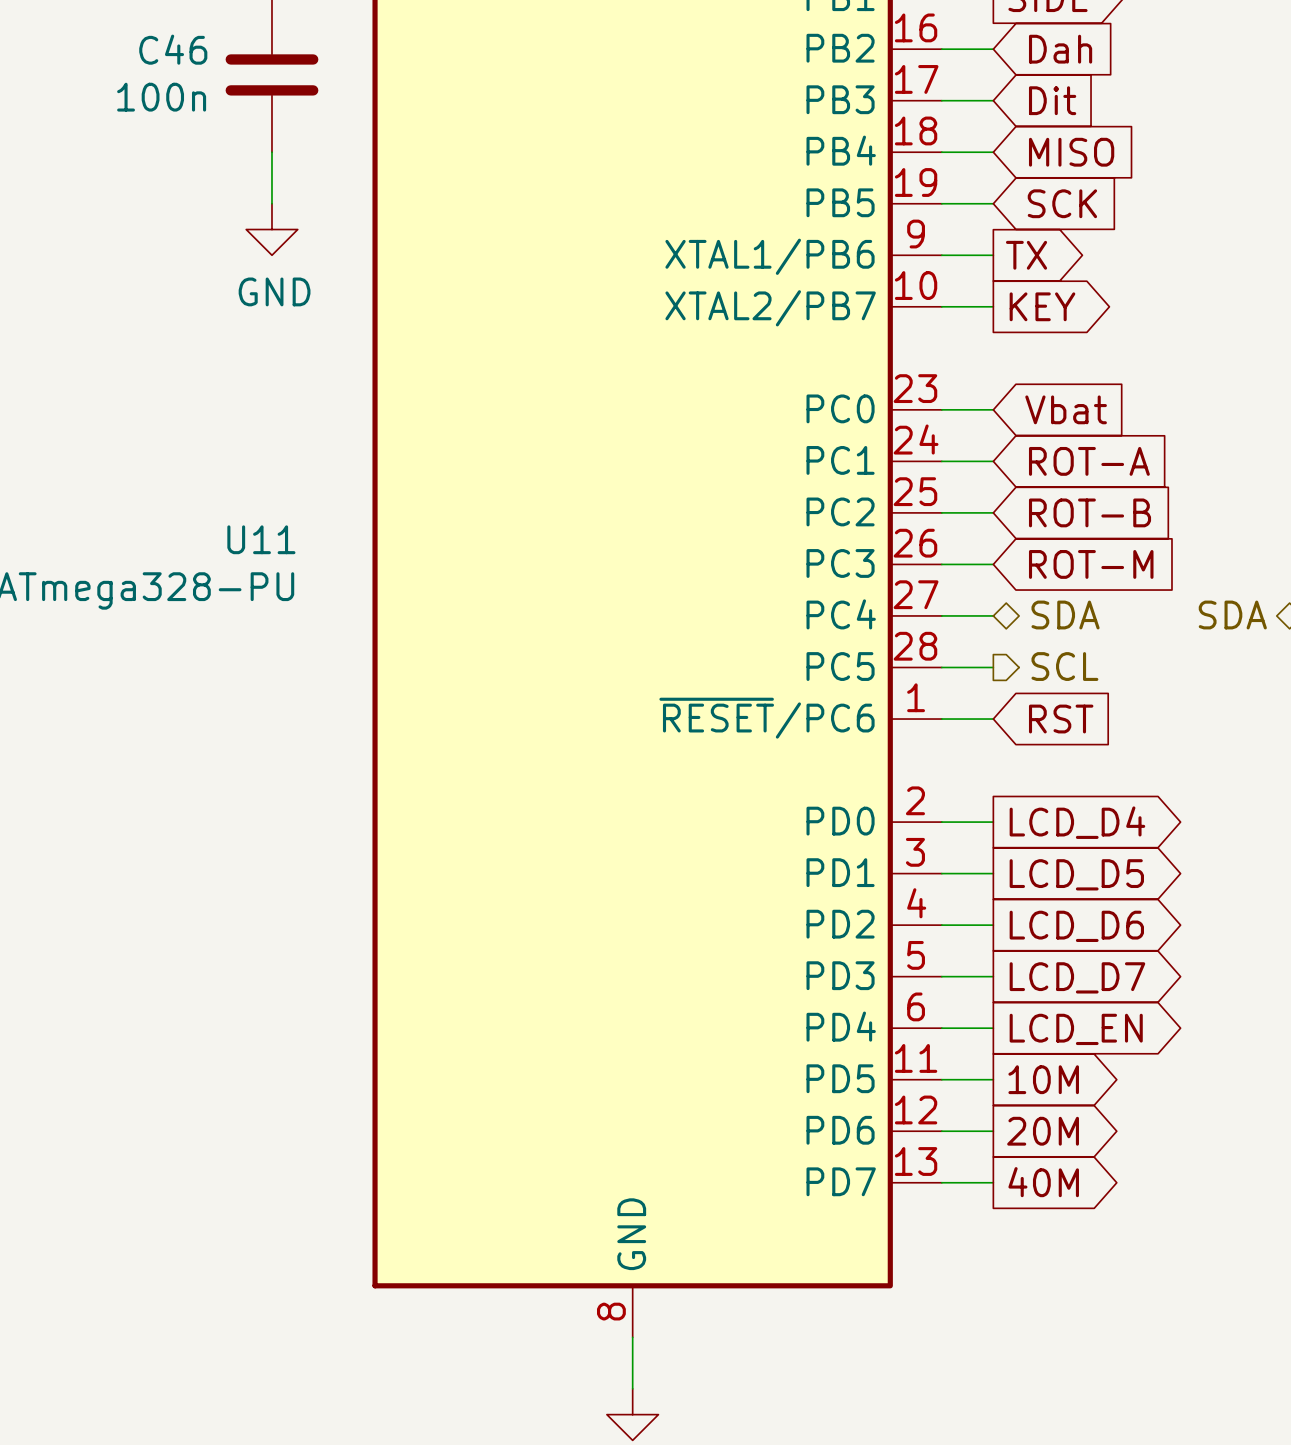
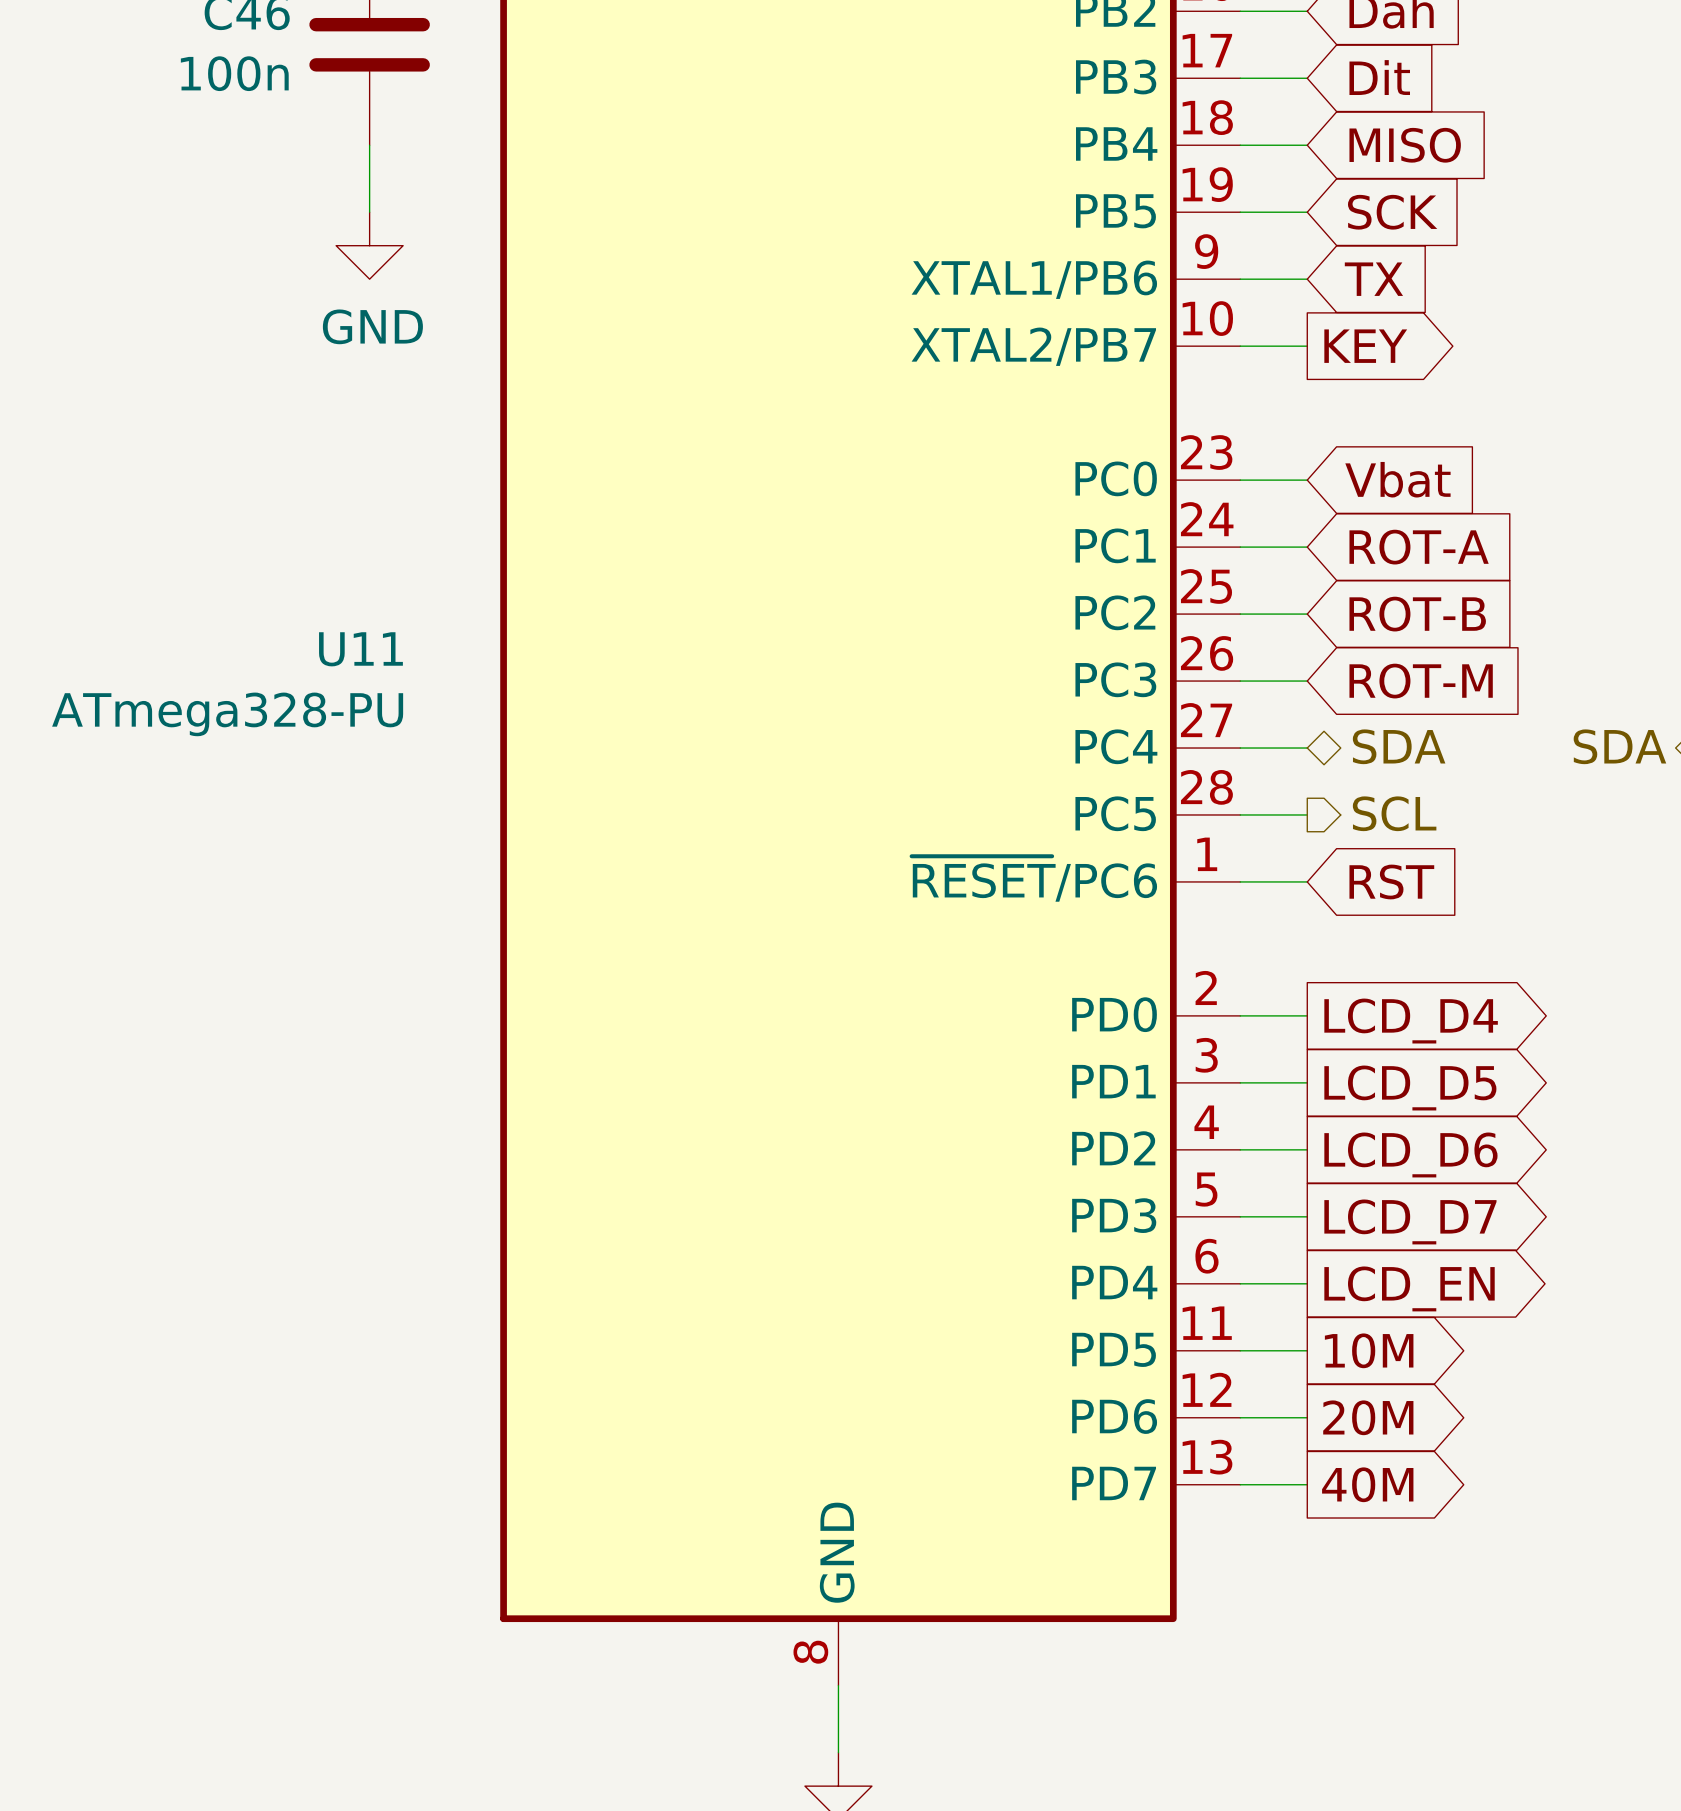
global label shape: output (1026, 255) -> input (1373, 279)

